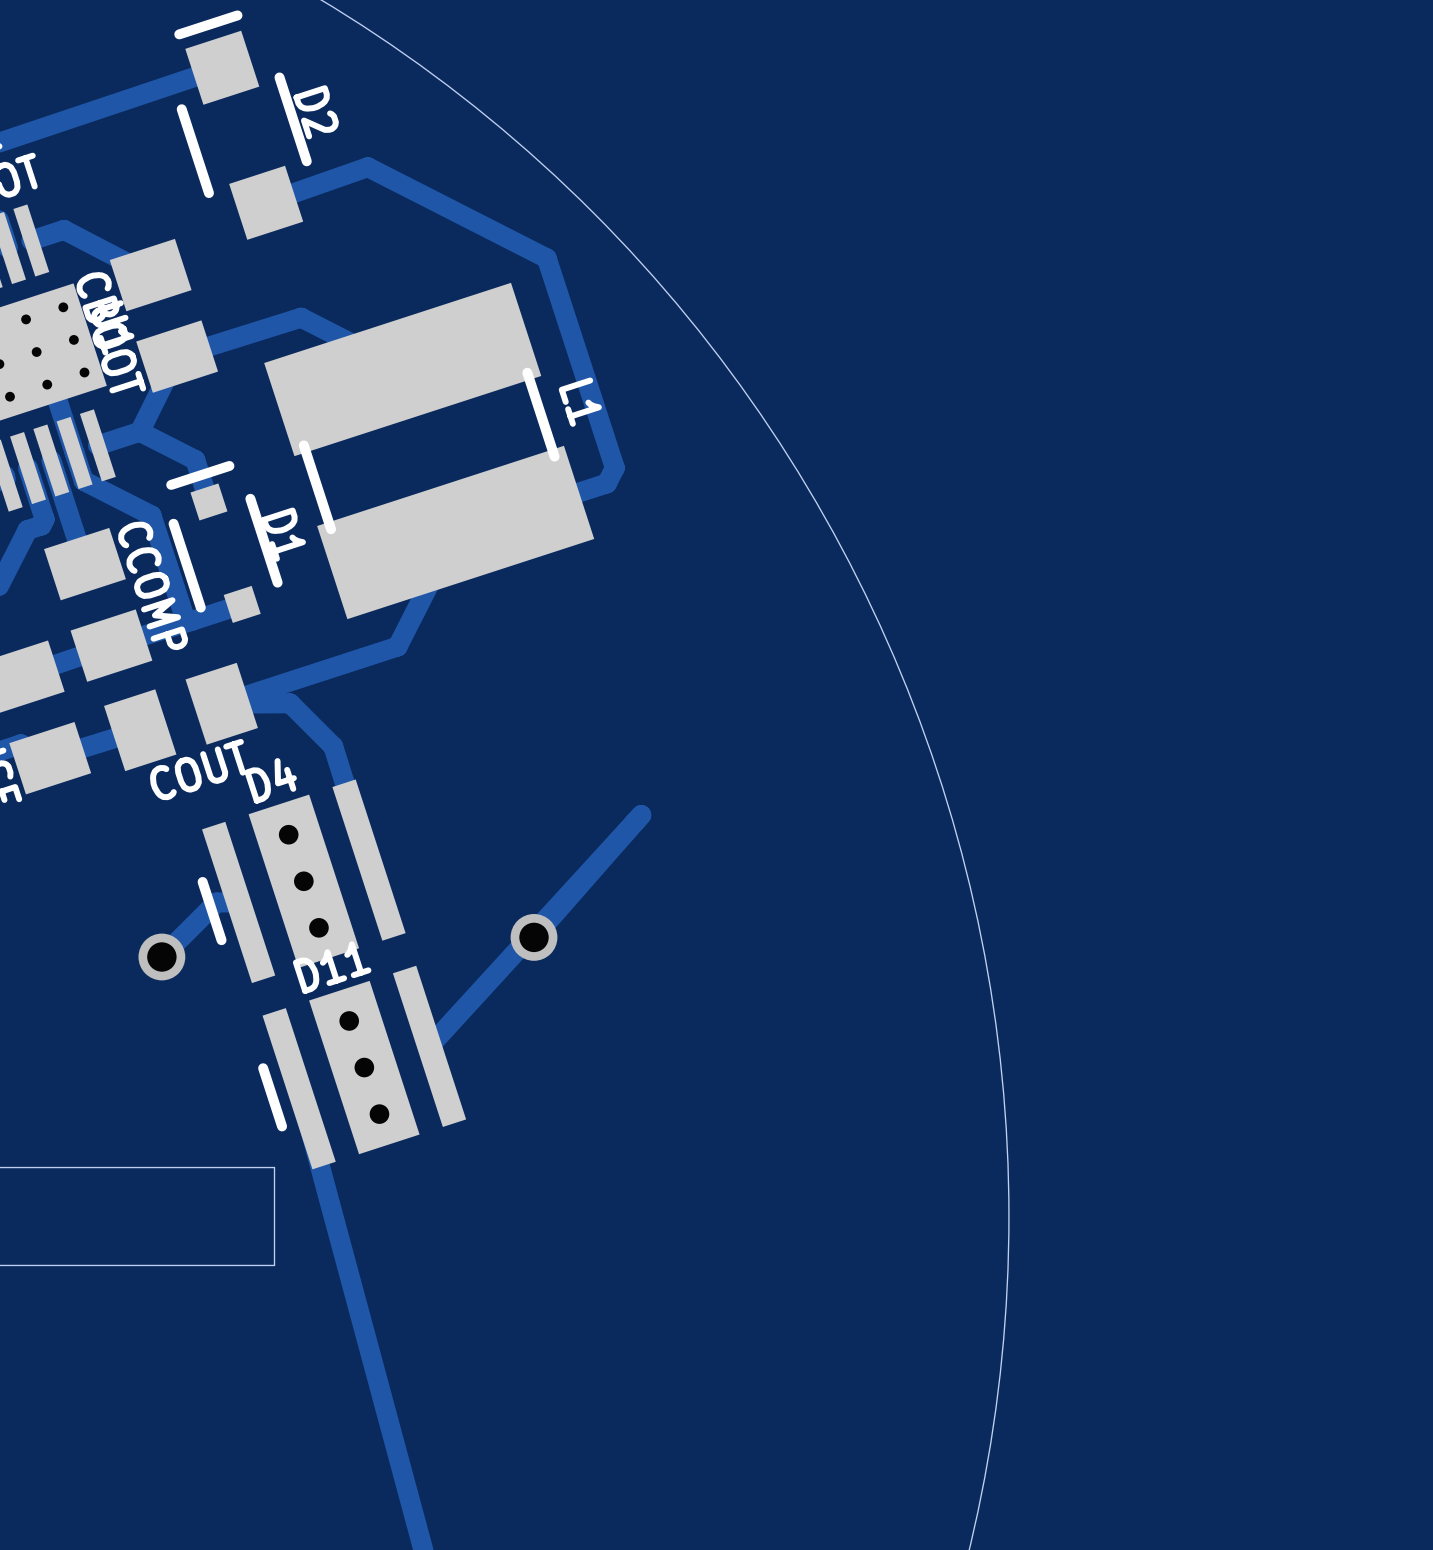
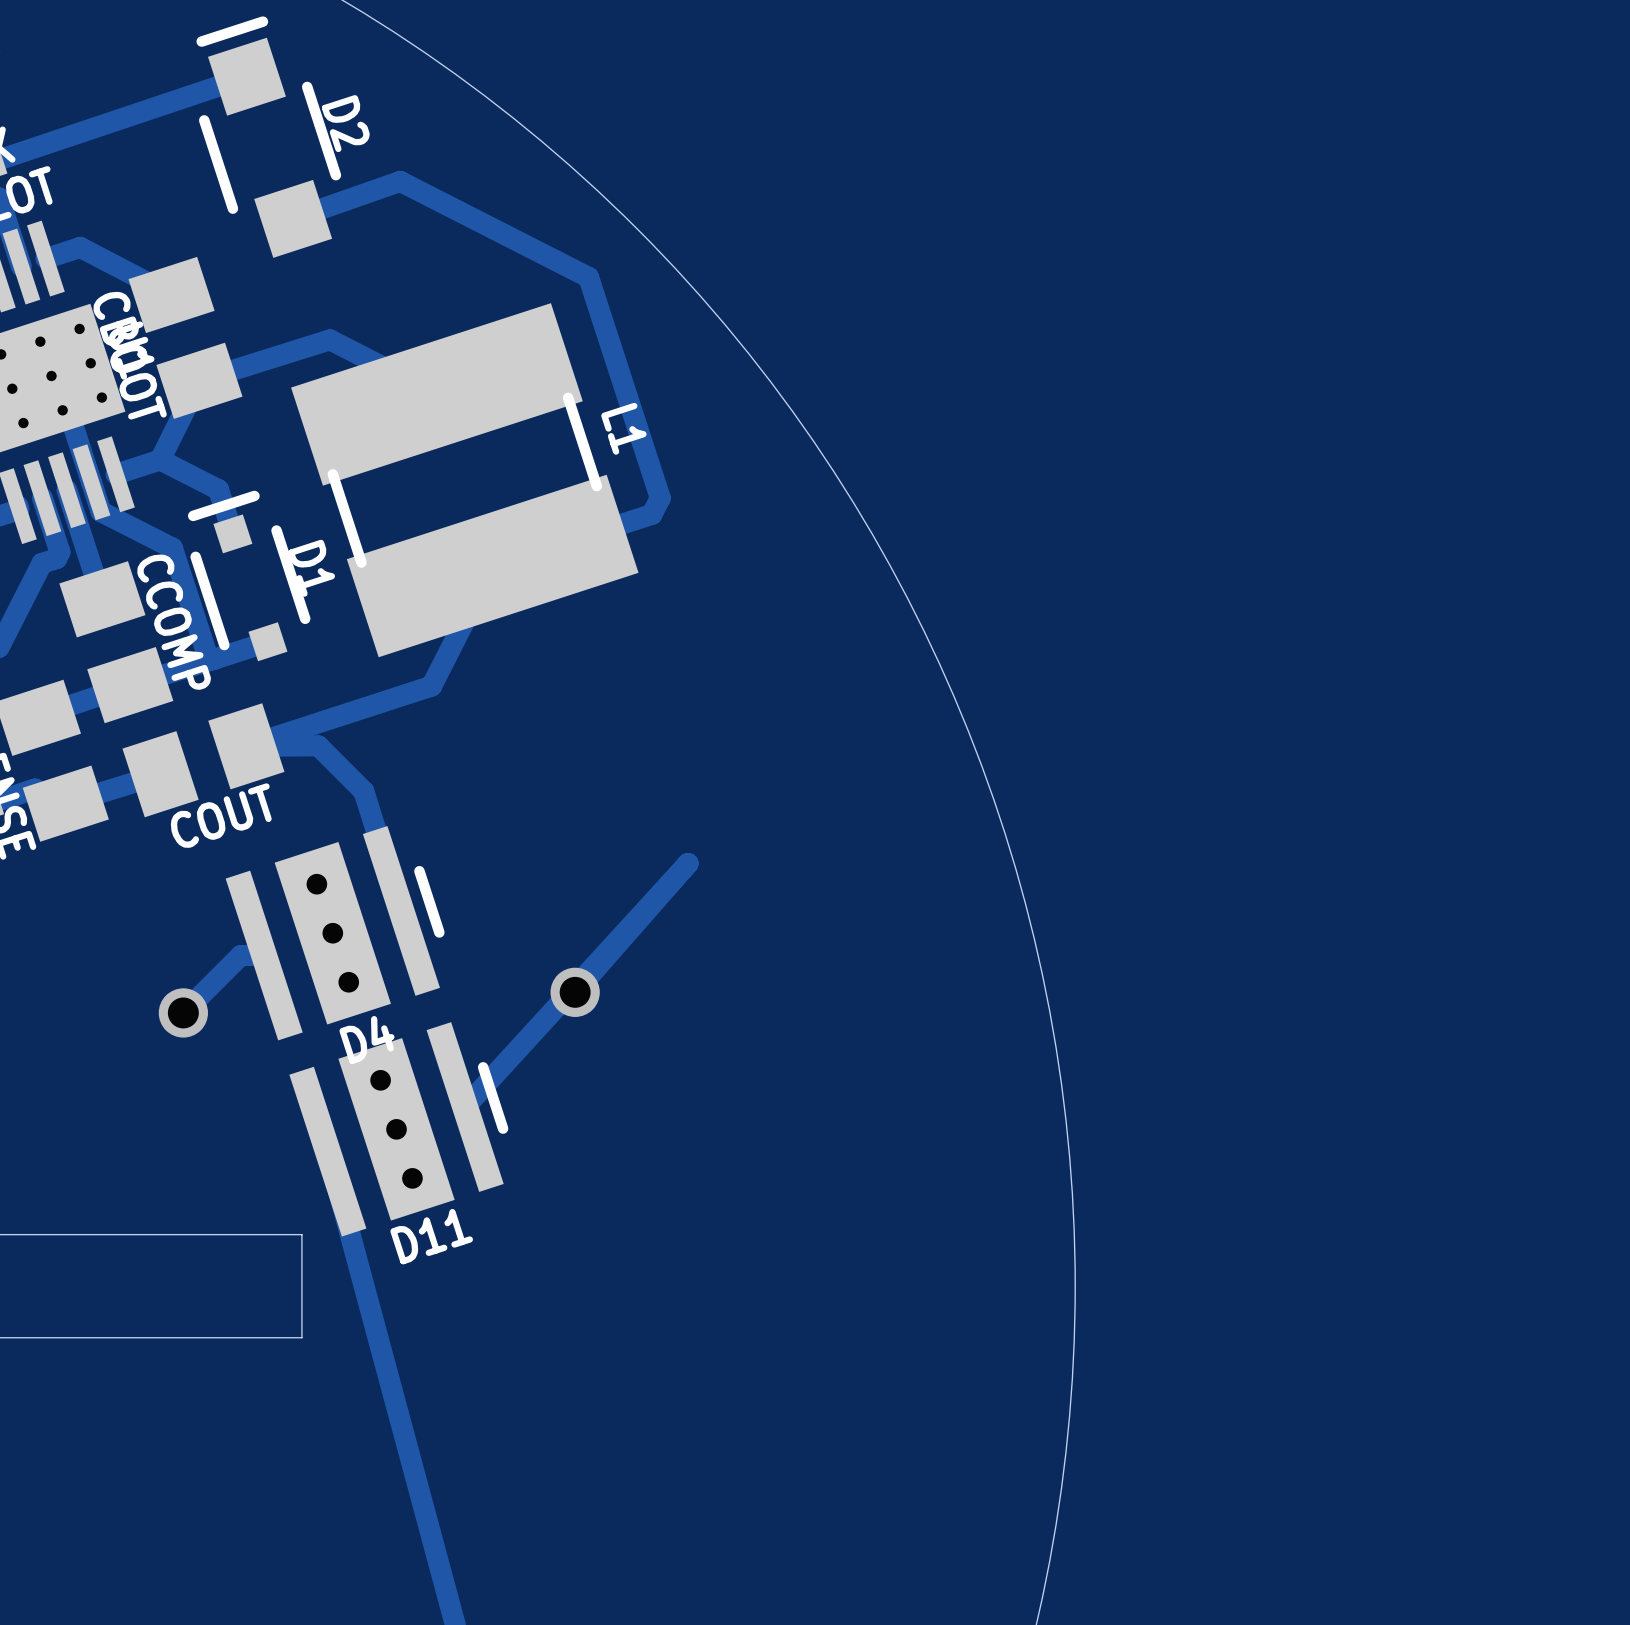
D4 rotation: 0° (301, 881) -> 180° (335, 933)
D11 rotation: 0° (362, 1067) -> 180° (398, 1129)

